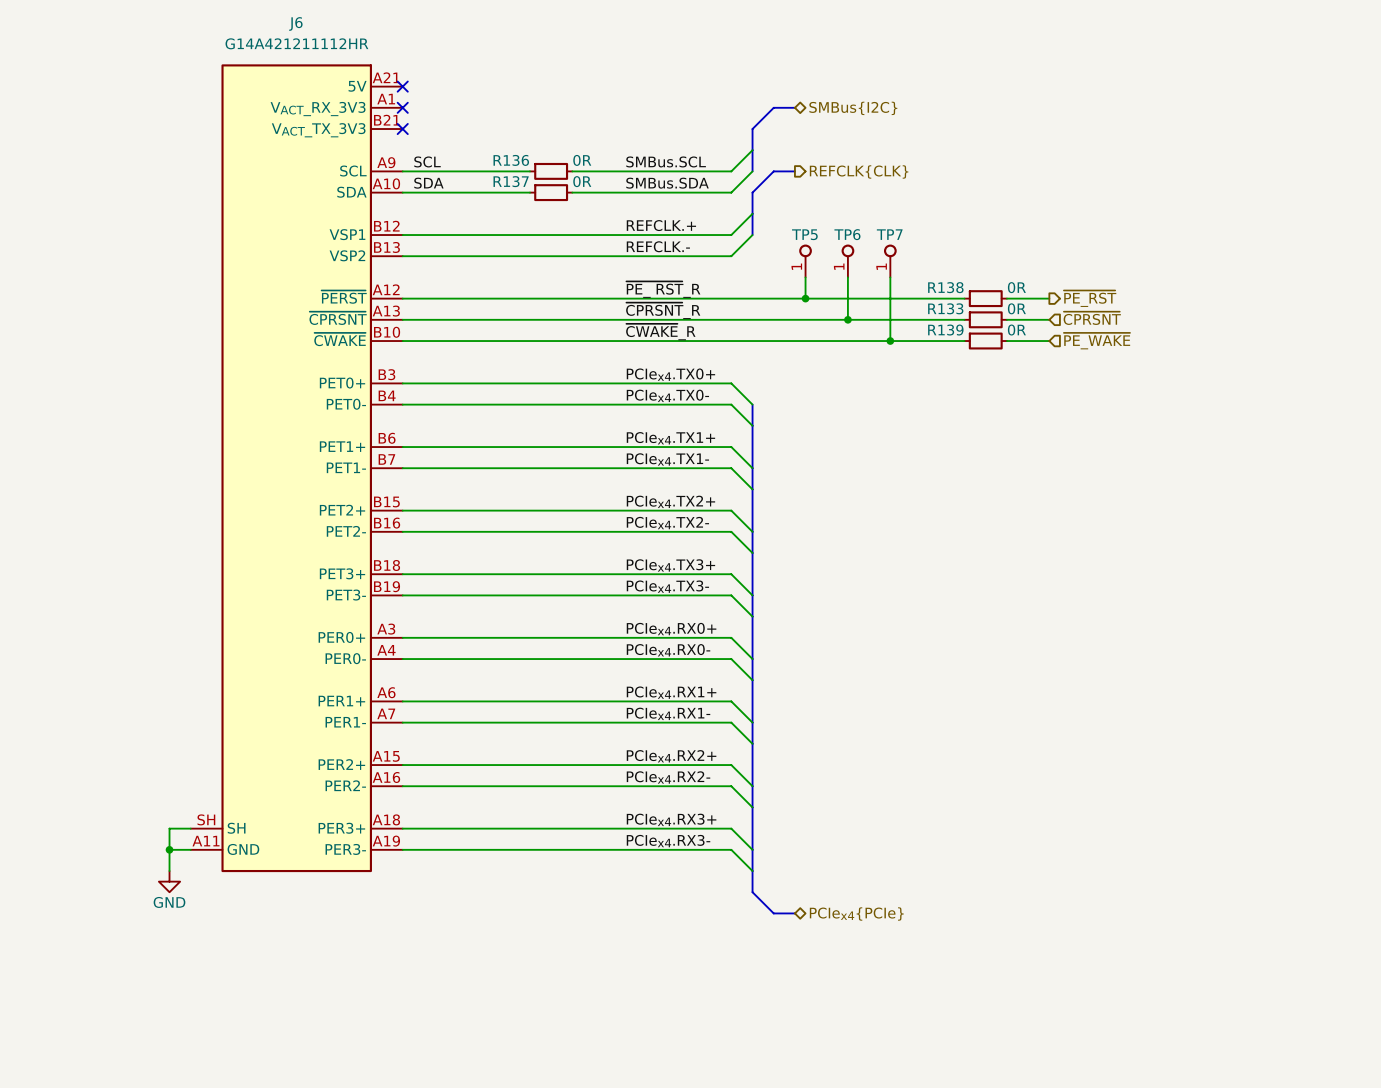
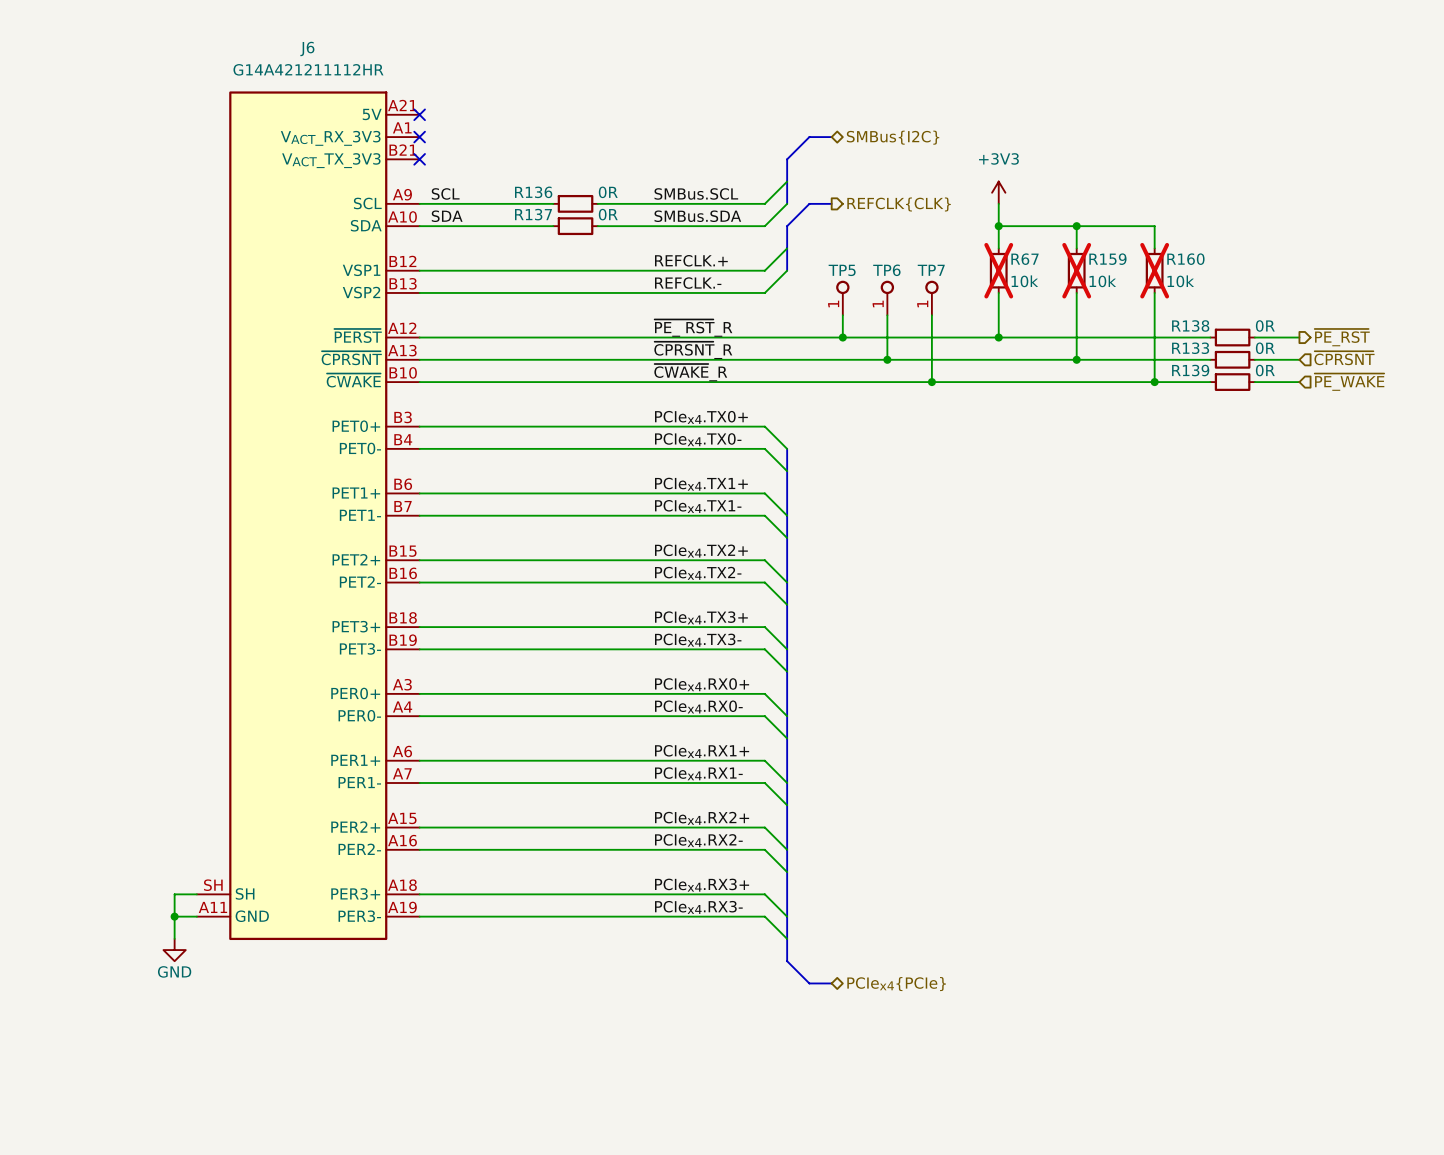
power symbol: none -> +3V3 (998, 192)
wire: none -> (998, 203) (998, 248)
wire: none -> (998, 226) (1154, 226) (1154, 248)
junction: none -> (998, 226)
wire: none -> (1076, 226) (1076, 248)
junction: none -> (1076, 226)
R67: none -> (998, 270)
R159: none -> (1076, 270)
R160: none -> (1154, 270)
wire: none -> (998, 292) (998, 337)
wire: none -> (1076, 292) (1076, 359)
wire: none -> (1154, 292) (1154, 382)
junction: none -> (998, 337)
wire: none -> (1009, 337) (1054, 337)
R138 position: (985, 298) -> (1232, 337)
wire: none -> (1098, 337) (1210, 337)
hierarchical label position: ~{PE_RST} (1090, 298) -> ~{PE_RST} (1342, 337)
wire: none -> (1254, 337) (1299, 337)
hierarchical label position: ~{CPRSNT} (1092, 318) -> ~{CPRSNT} (1344, 358)
wire: none -> (1009, 359) (1054, 359)
R133 position: (985, 319) -> (1232, 359)
junction: none -> (1076, 359)
wire: none -> (1098, 359) (1210, 359)
wire: none -> (1254, 359) (1299, 359)
wire: none -> (1009, 382) (1054, 382)
R139 position: (985, 341) -> (1232, 382)
wire: none -> (1098, 382) (1210, 382)
hierarchical label position: ~{PE_WAKE} (1097, 341) -> ~{PE_WAKE} (1349, 382)
junction: none -> (1154, 382)
wire: none -> (1254, 382) (1299, 382)

